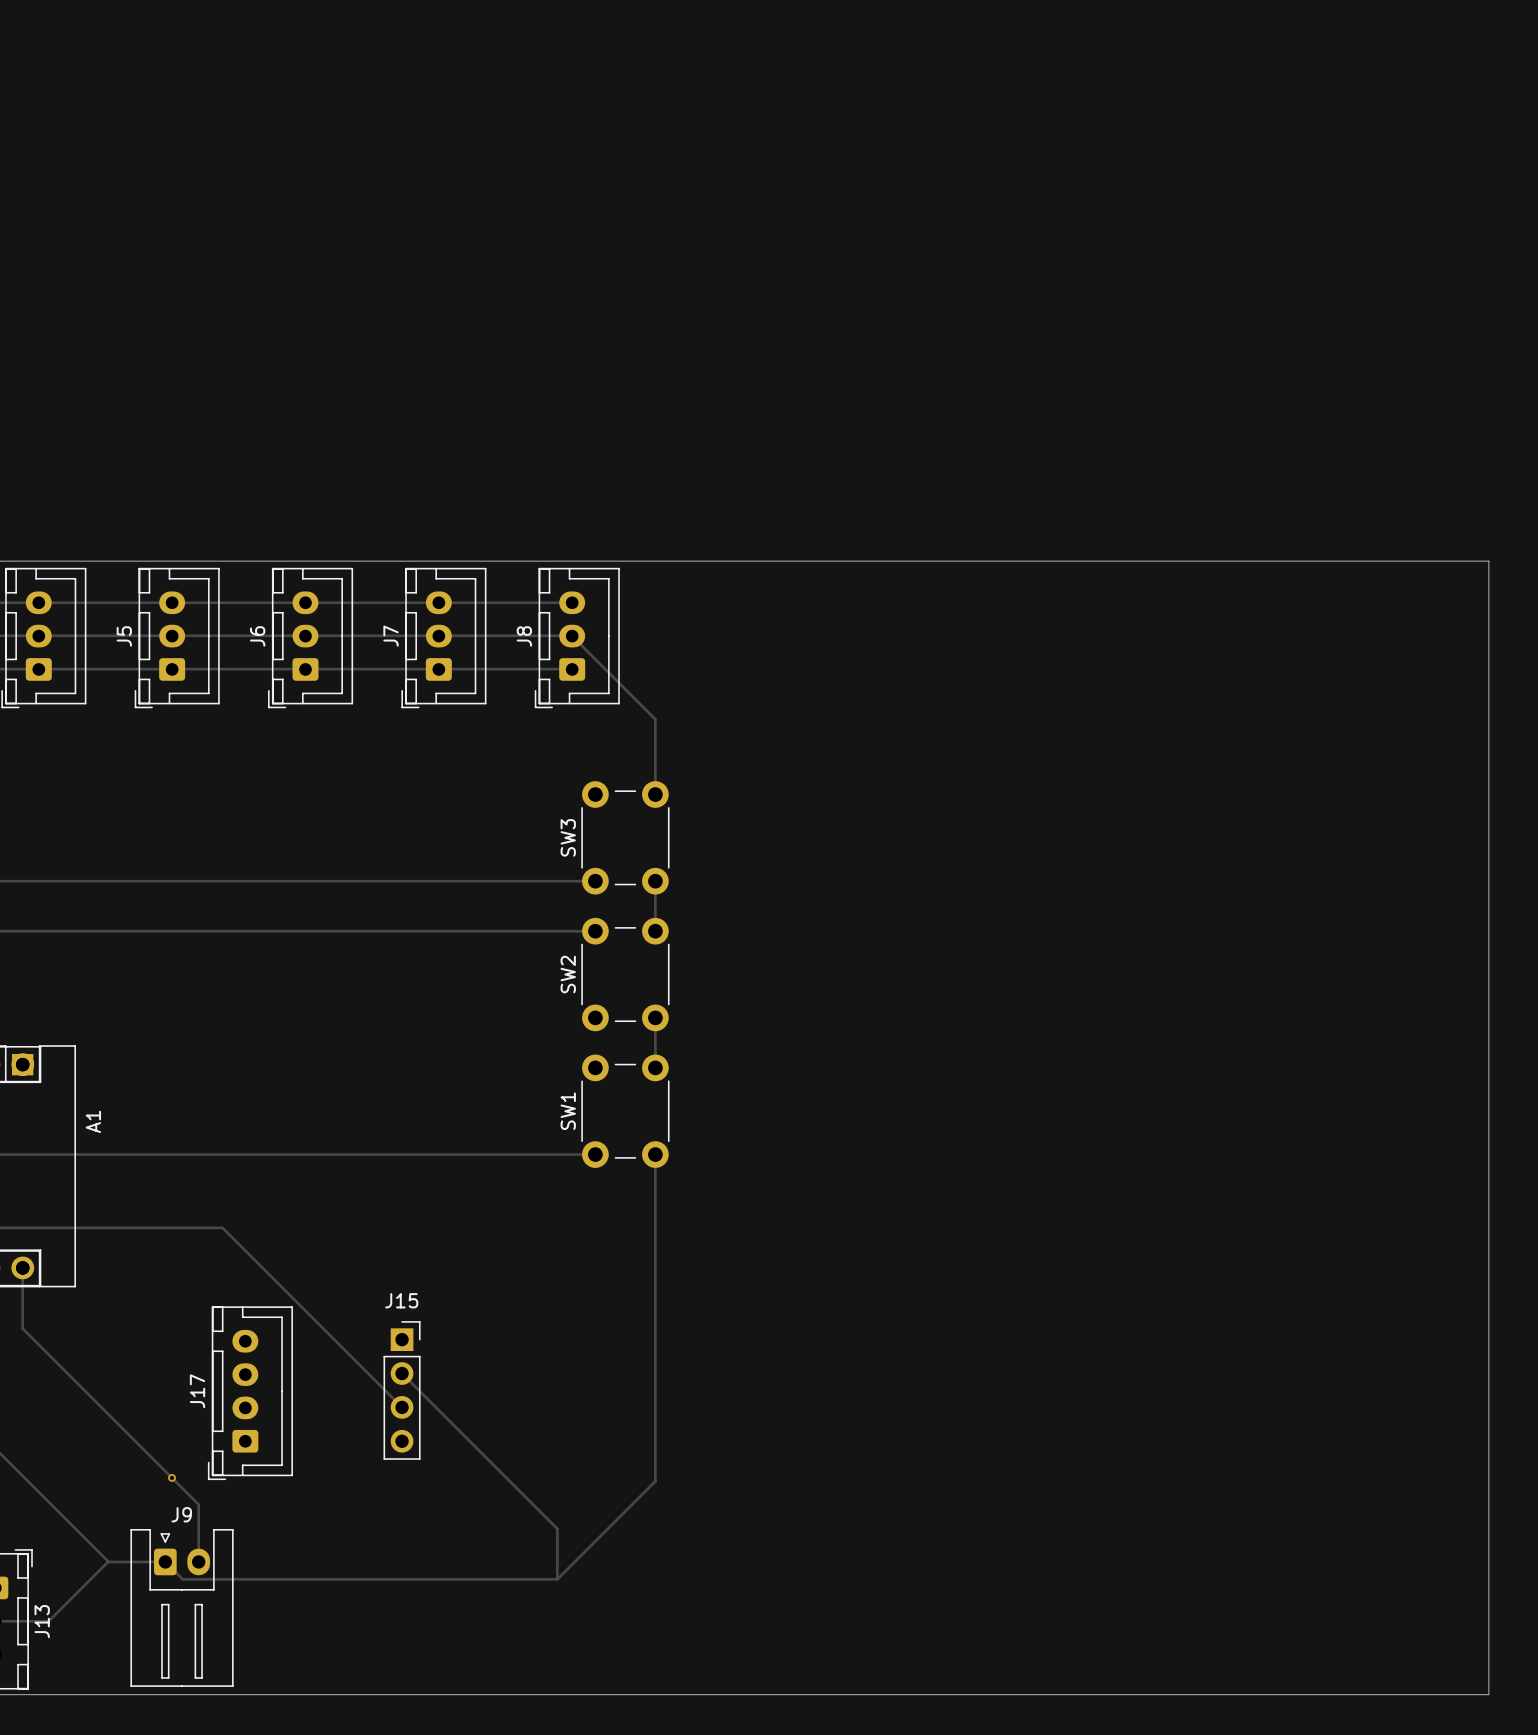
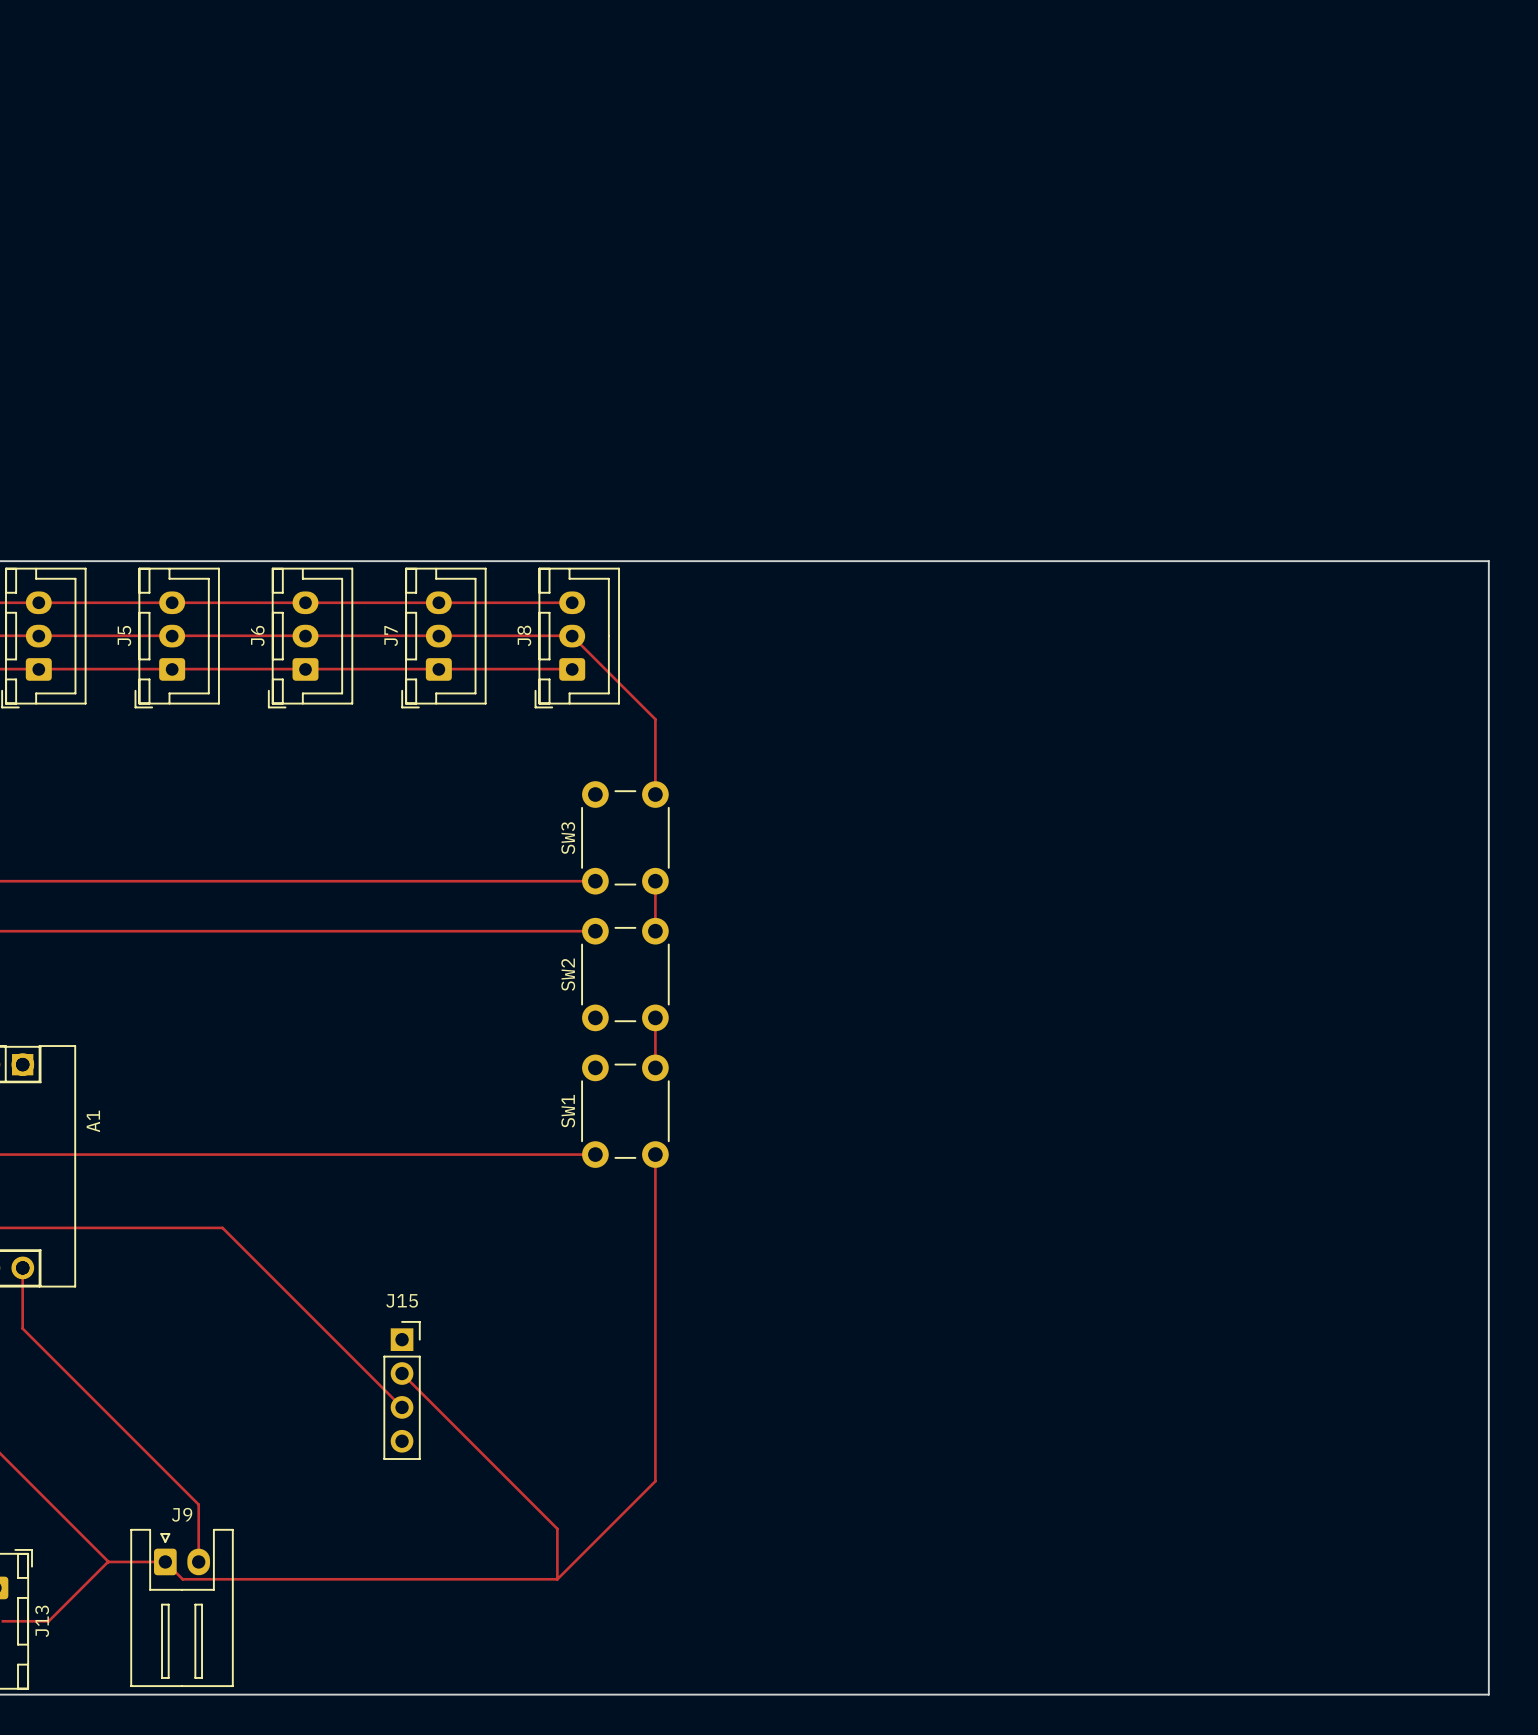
J17: (250, 1393) -> none
via: (172, 1477) -> none

